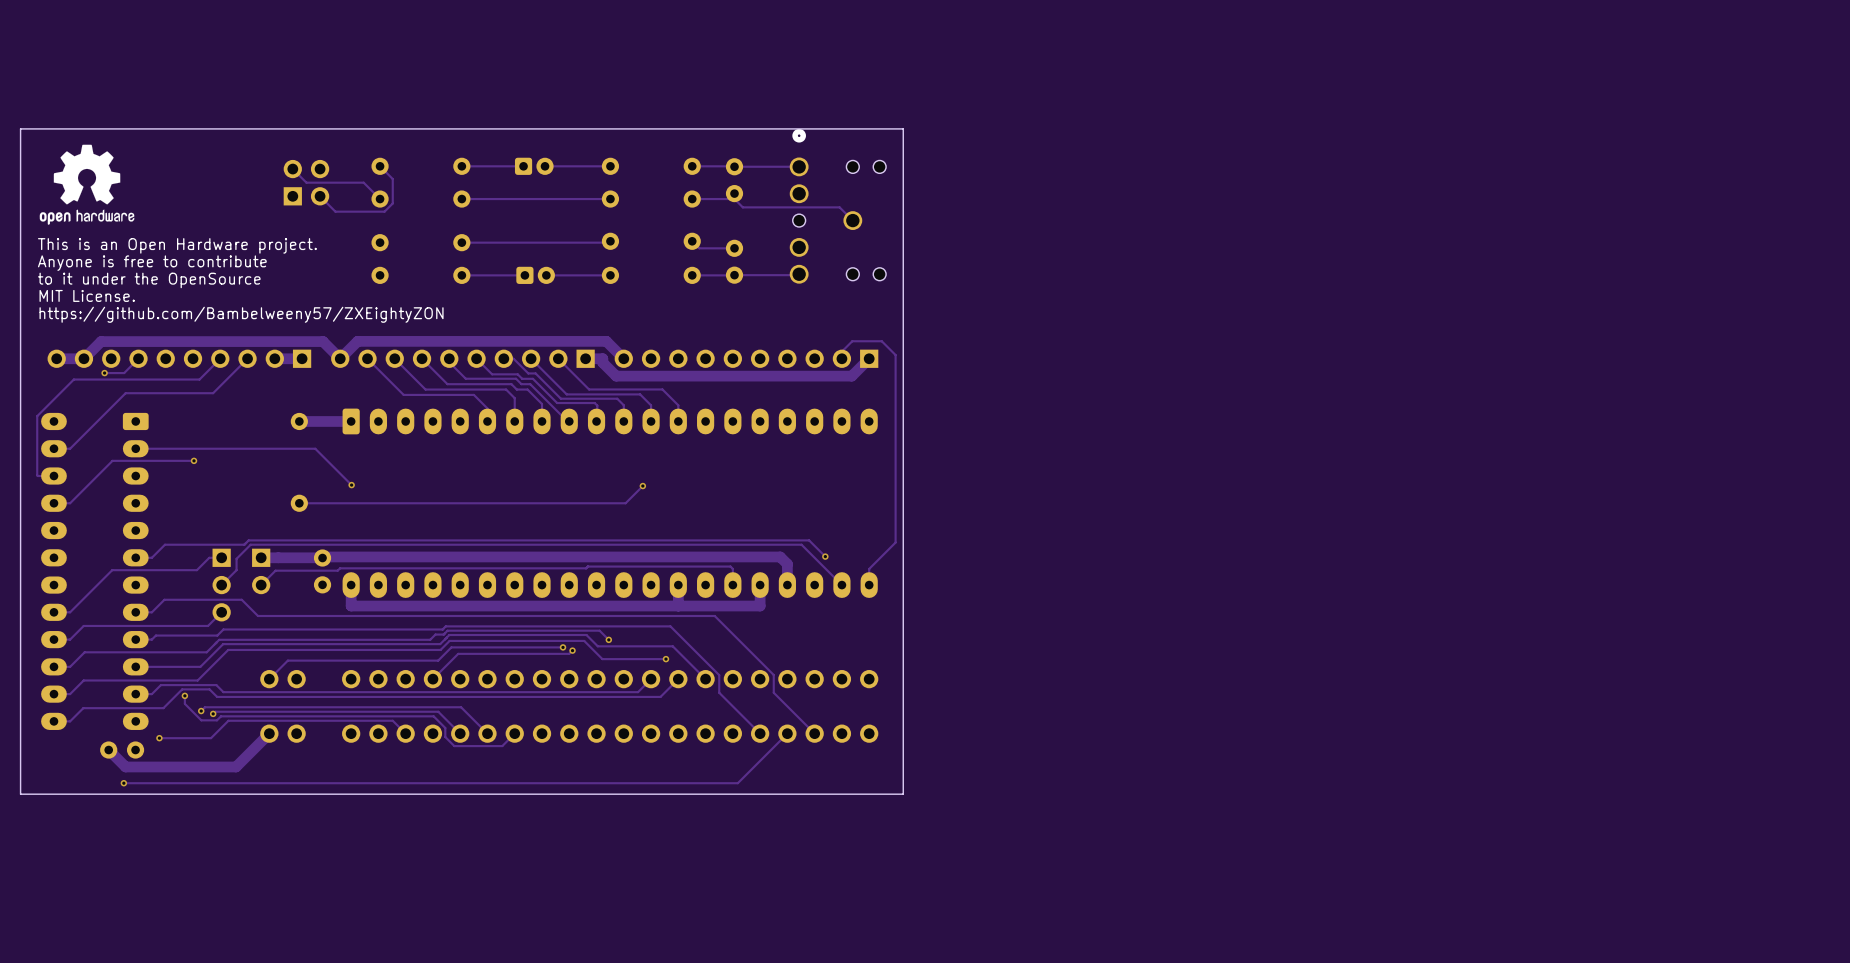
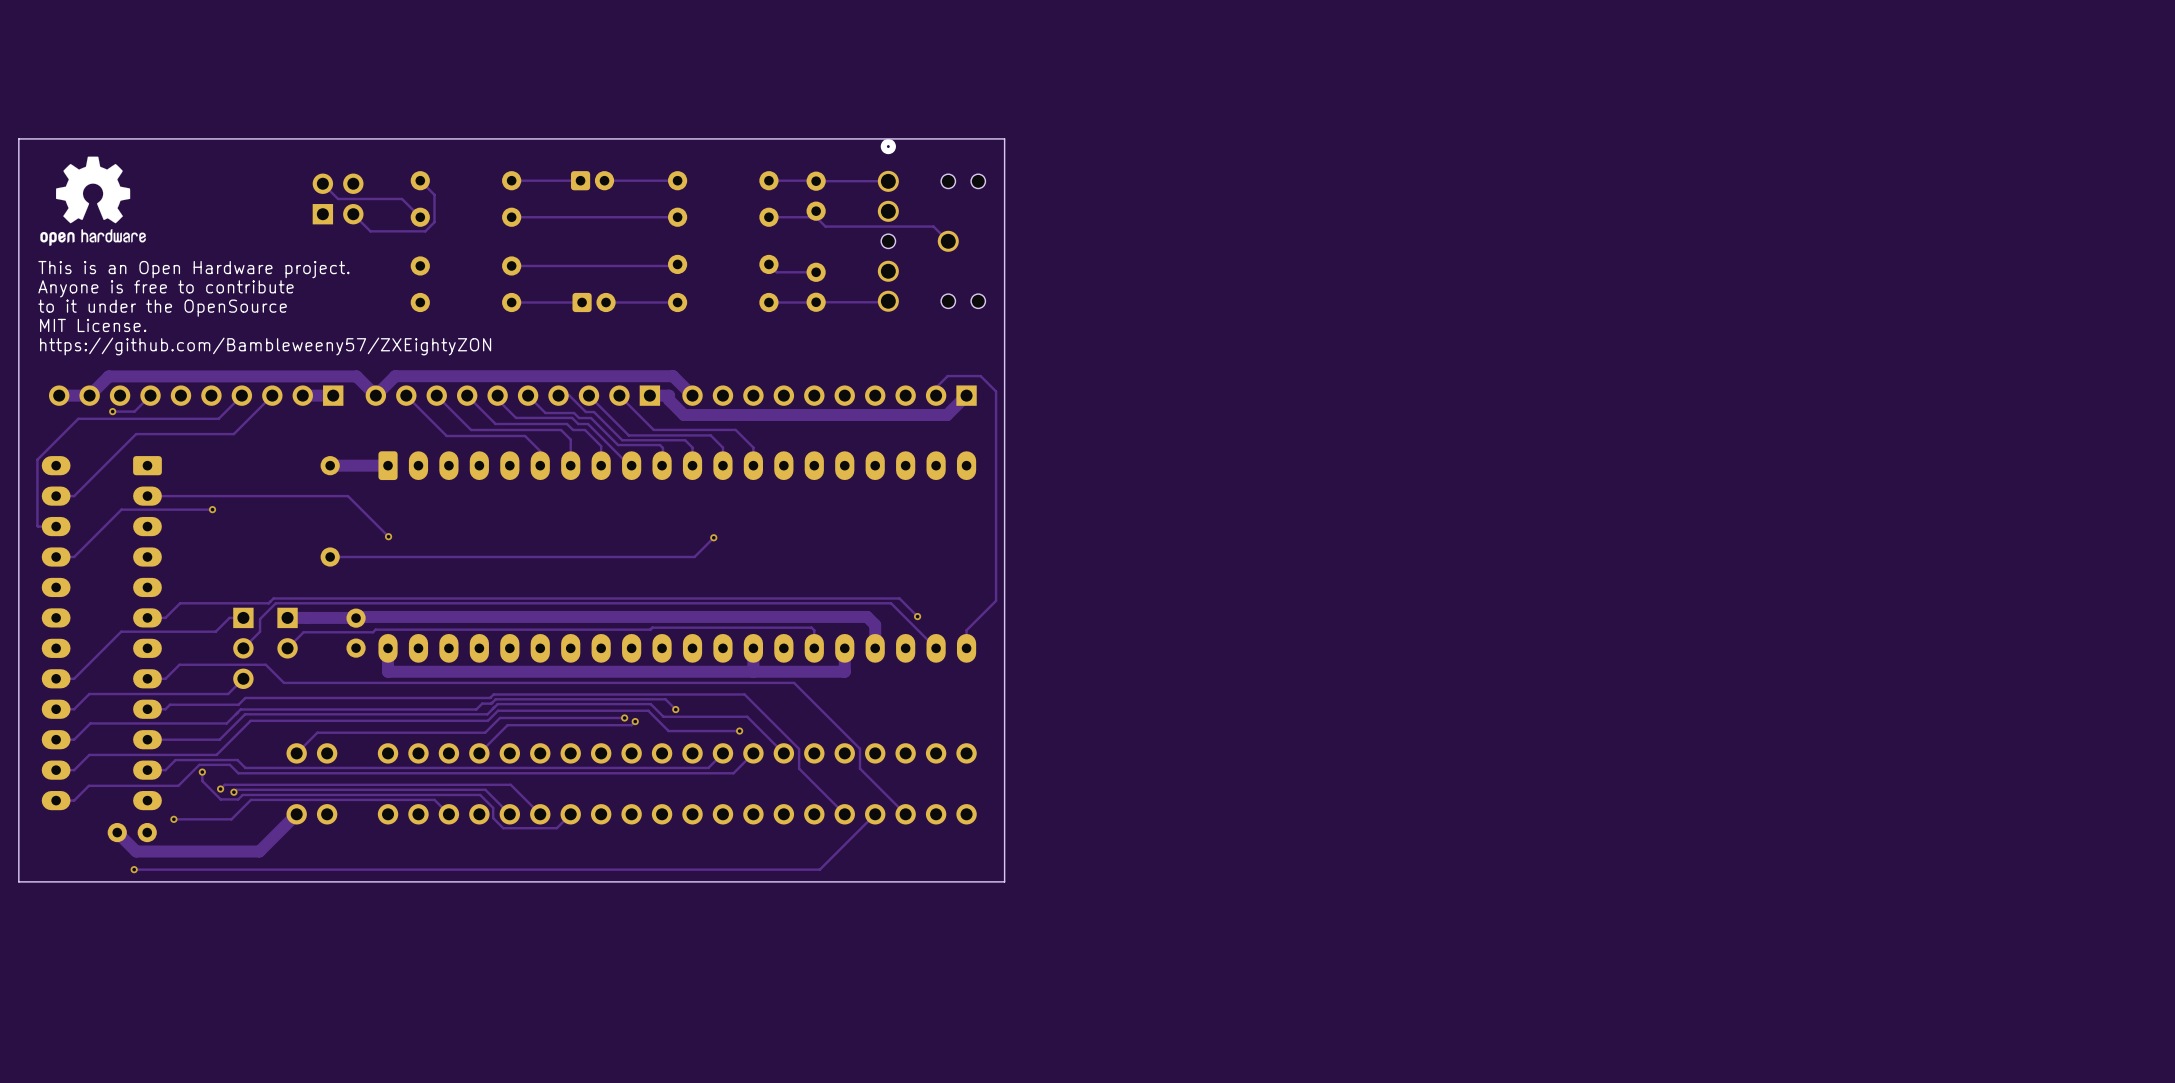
text: https://github.com/Bambelweeny57/ZXEightyZON (241, 314) -> https://github.com/Bambleweeny57/ZXEightyZON (265, 346)

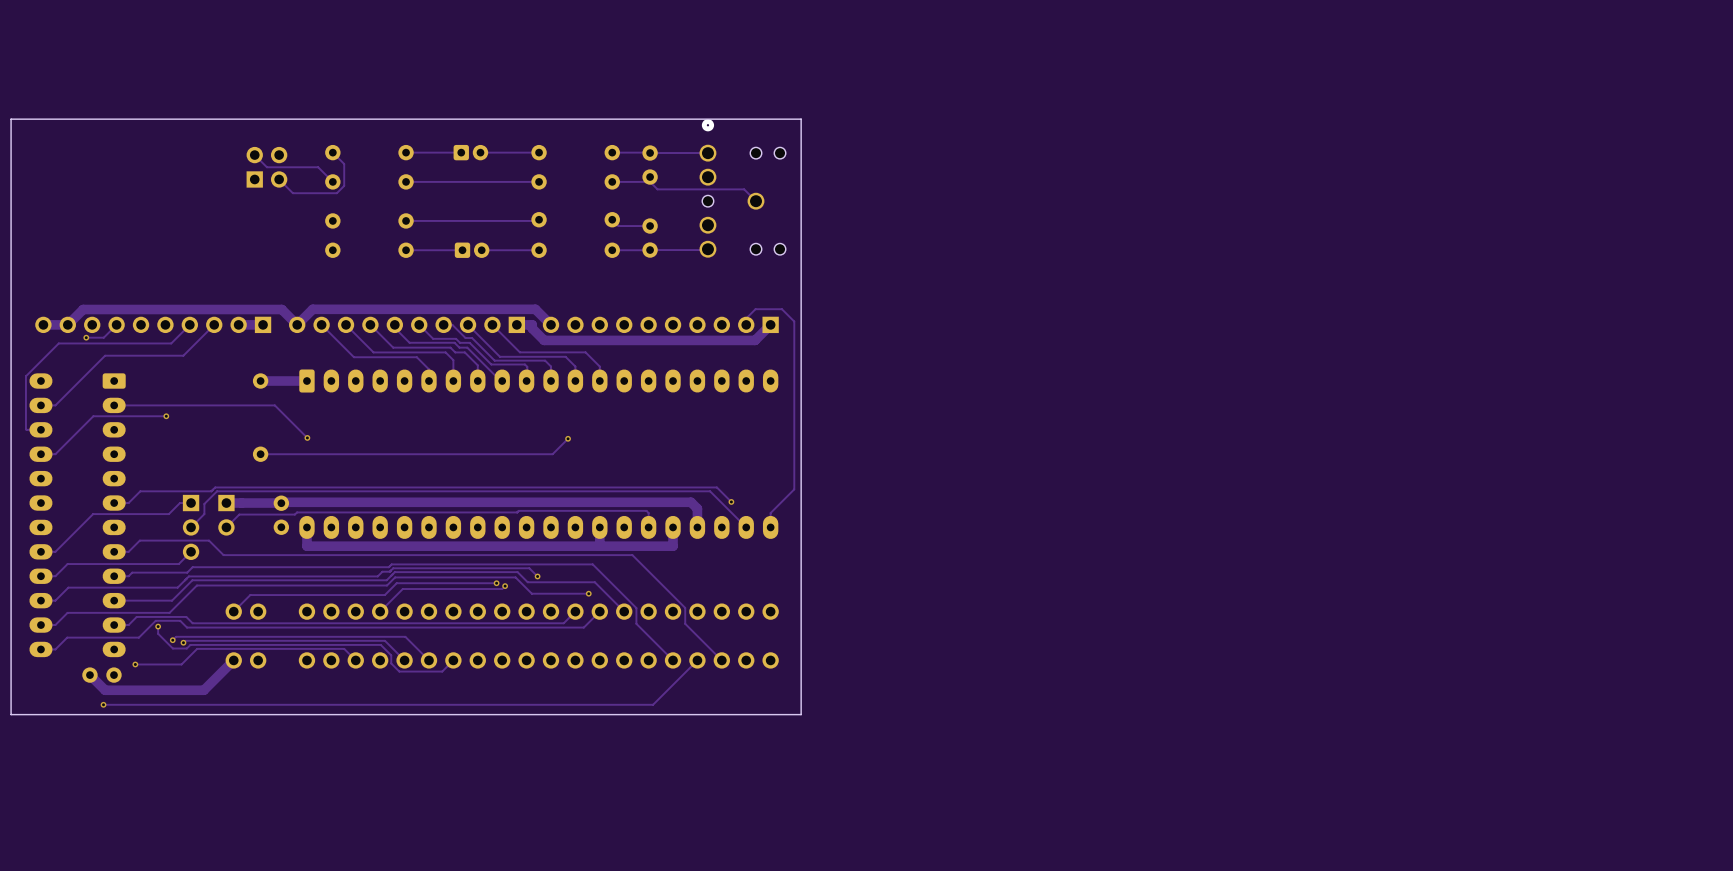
drawing: [40, 156, 146, 246] -> none
text: This is an Open Hardware project. (193, 269) -> none
text: Anyone is free to contribute (165, 288) -> none
text: to it under the OpenSource (162, 308) -> none
text: MIT License. (93, 325) -> none
text: https://github.com/Bambleweeny57/ZXEightyZON (265, 346) -> none

